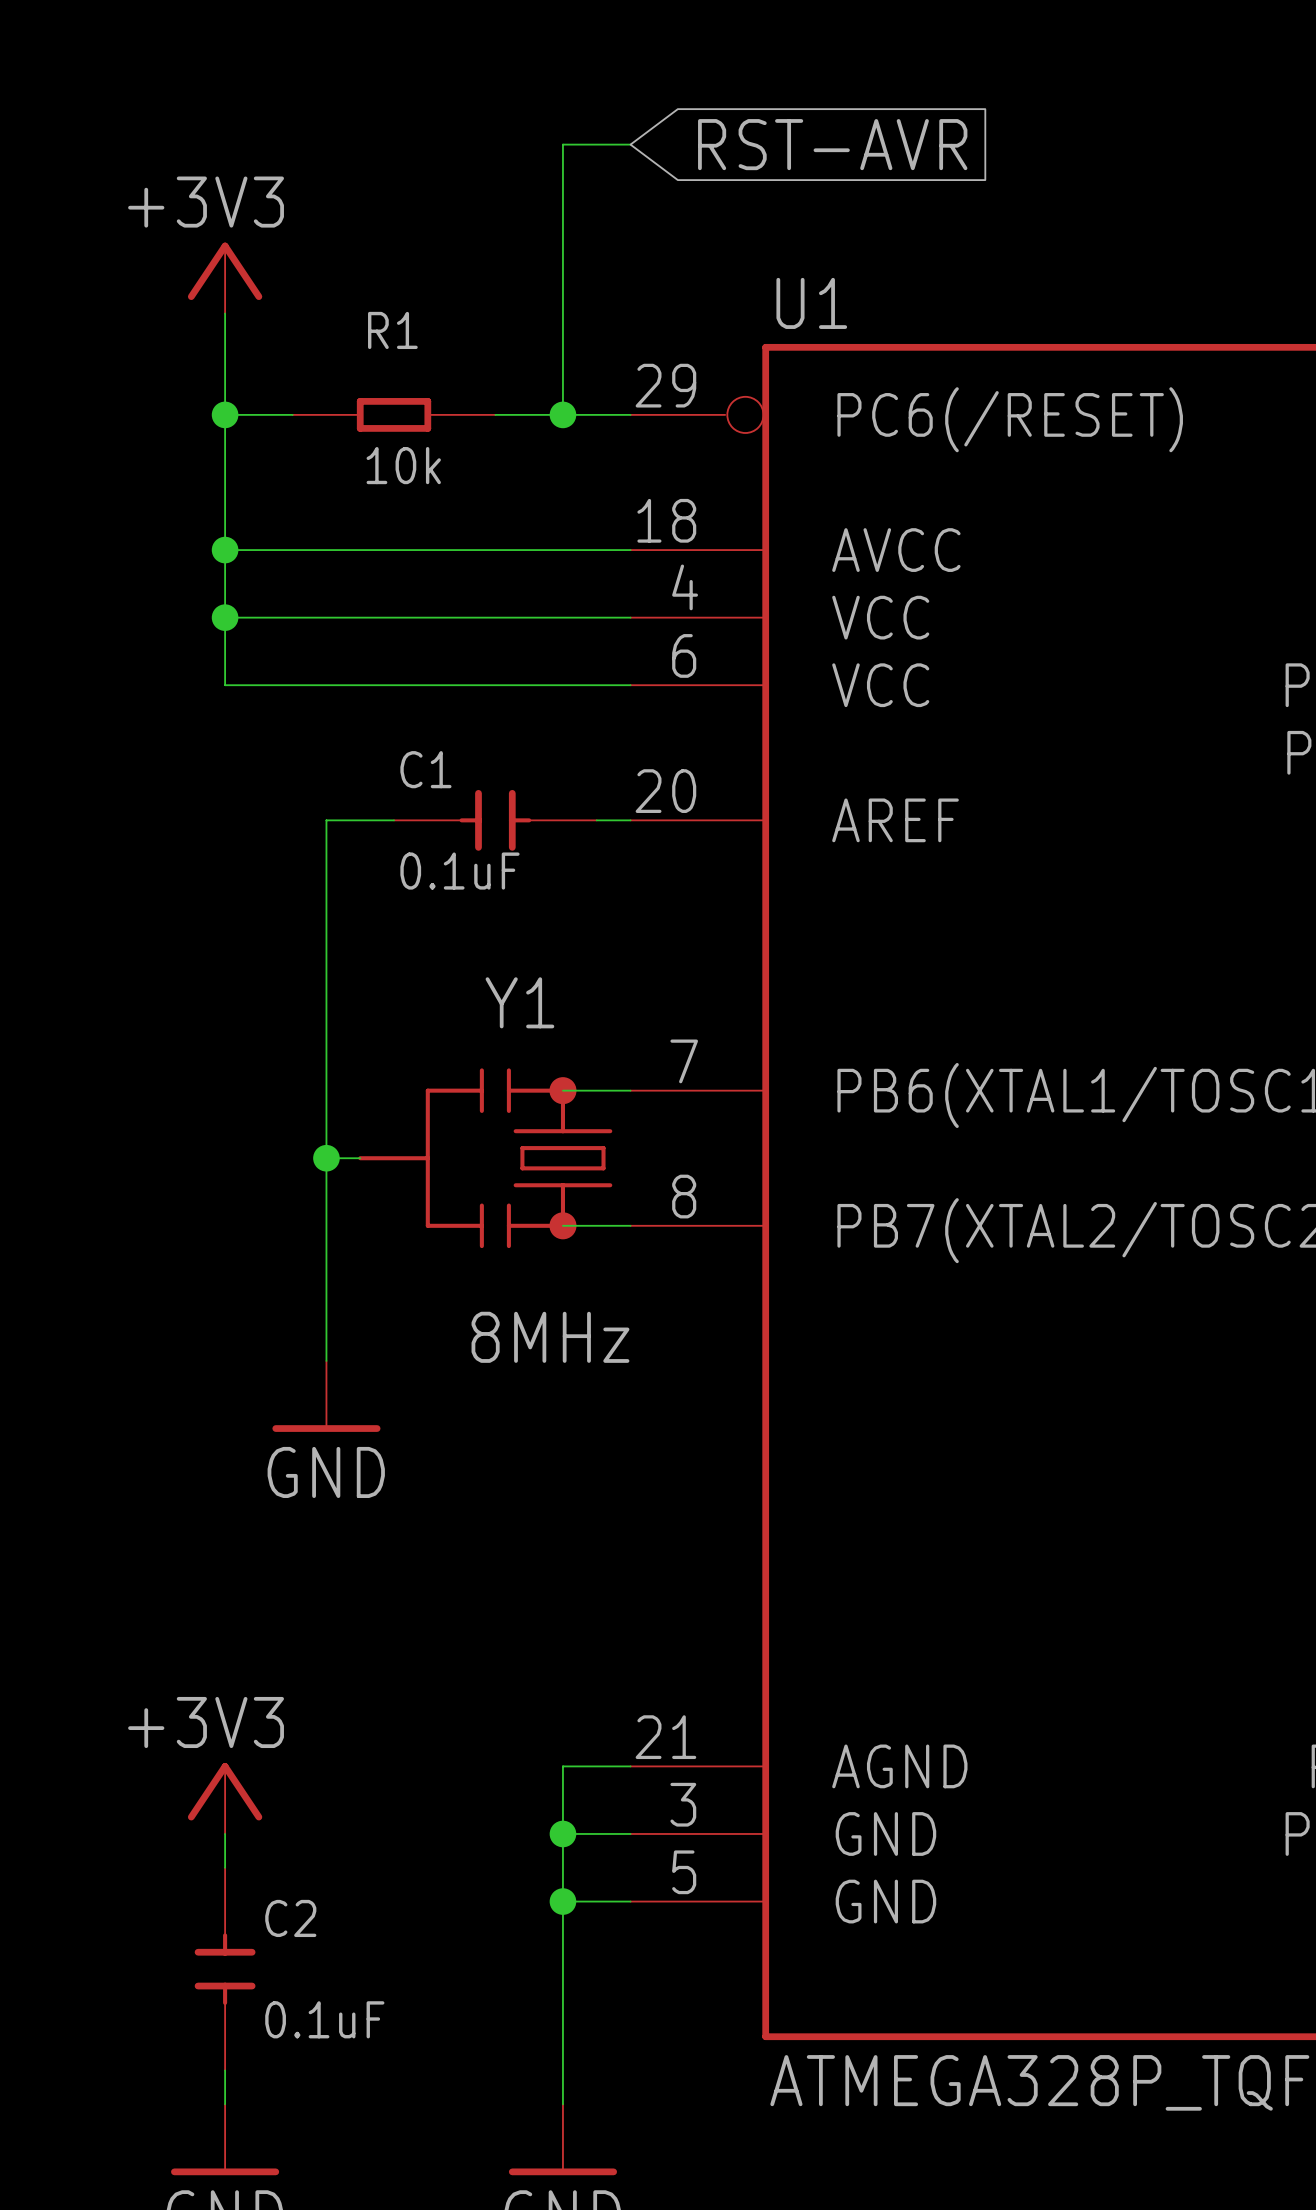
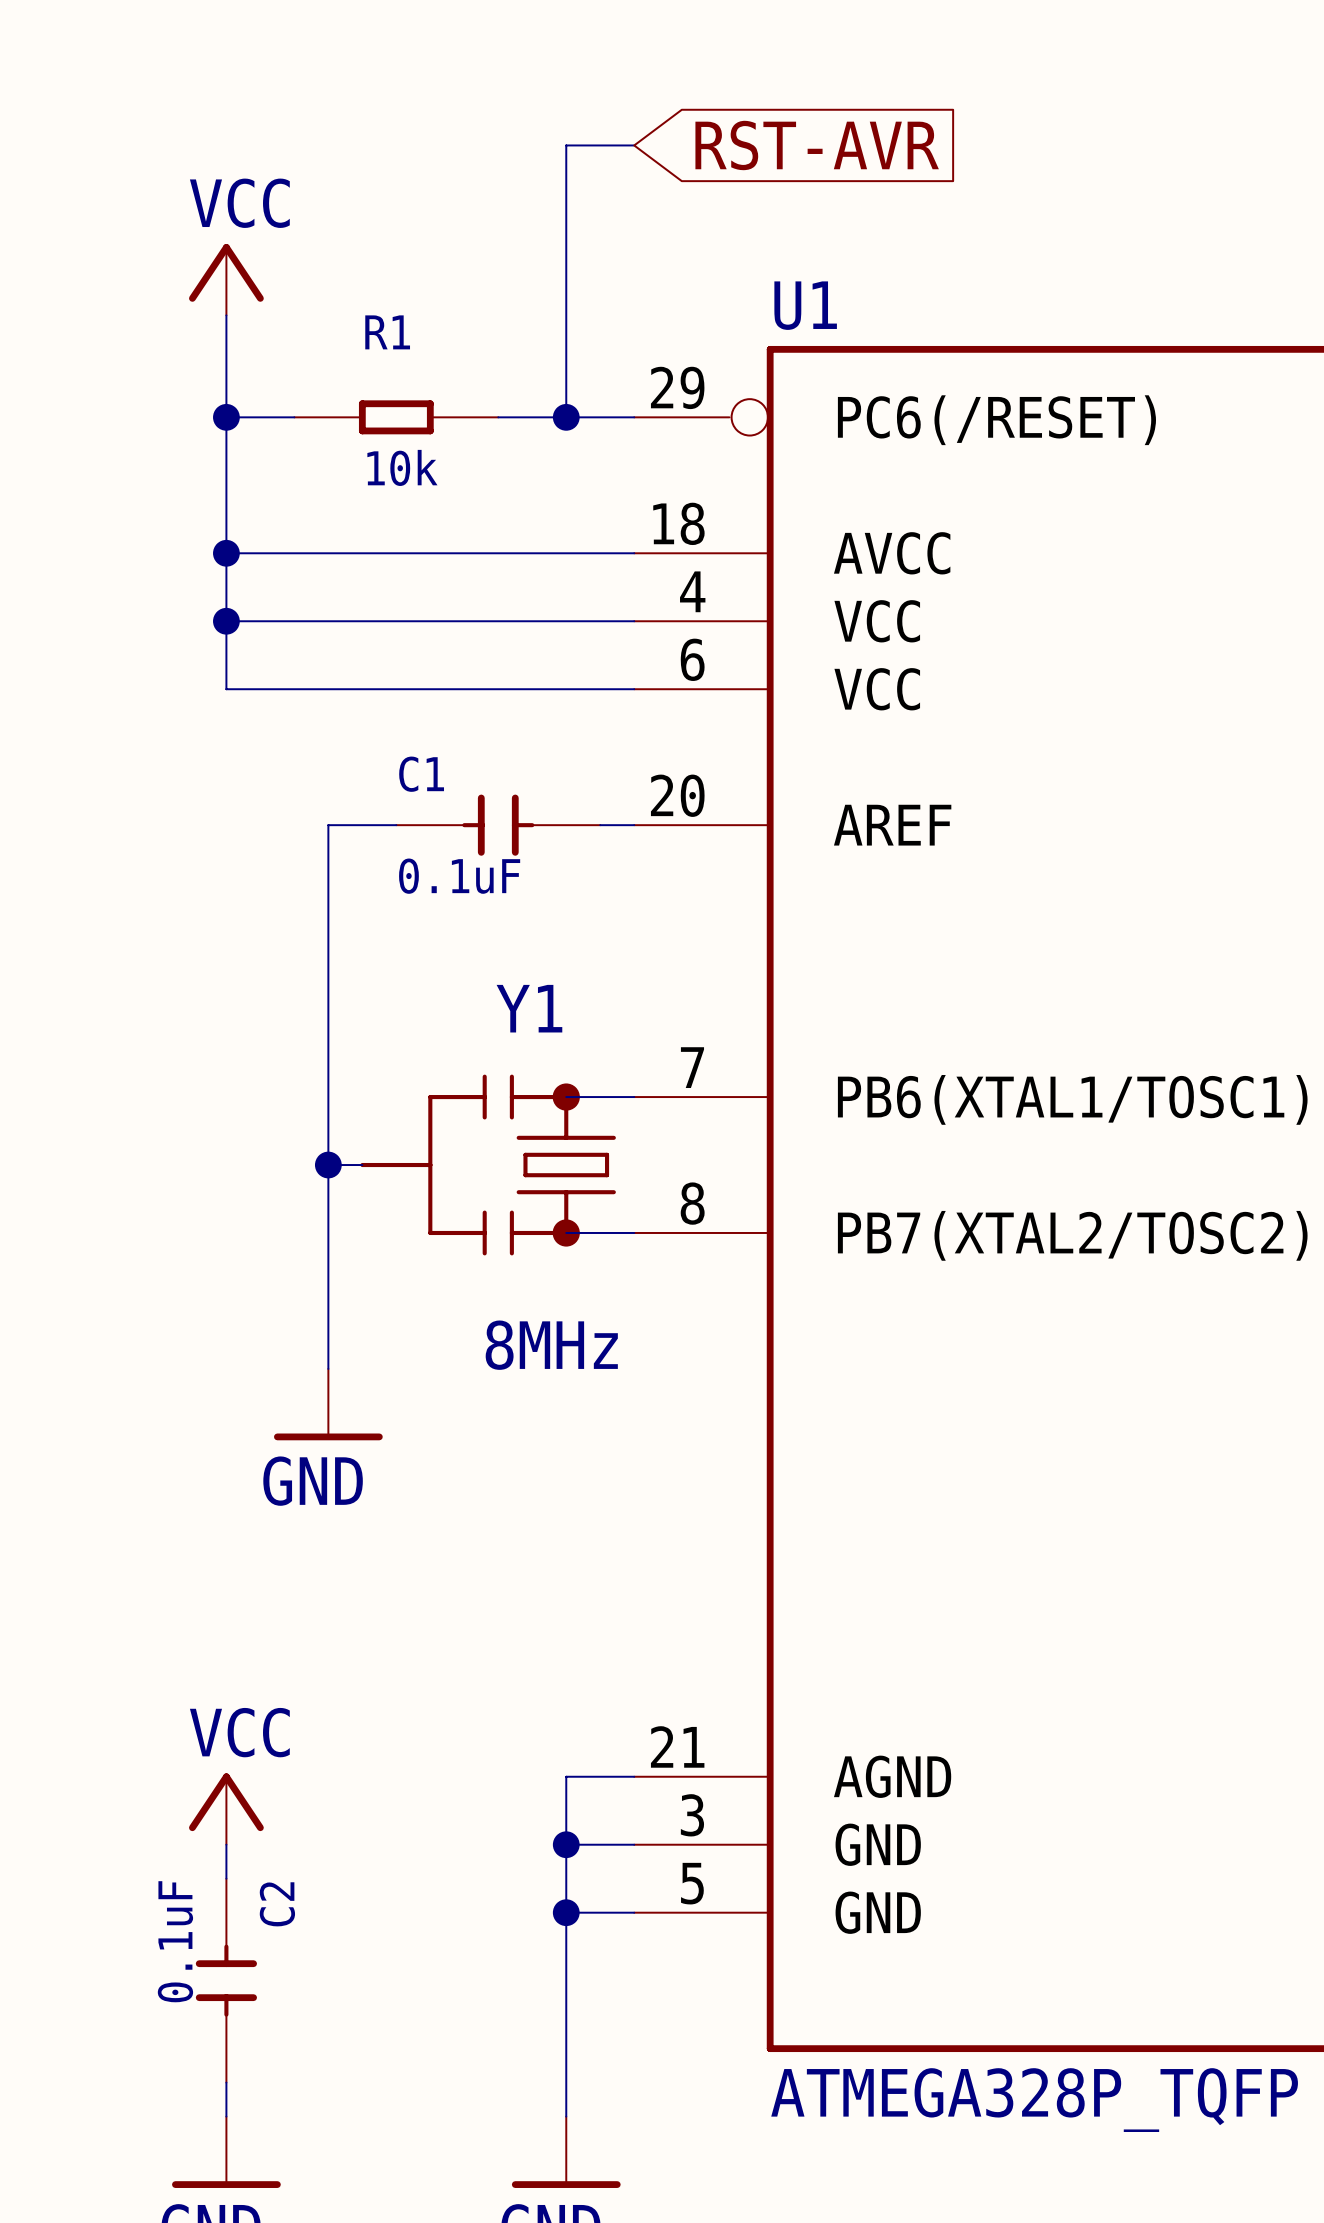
power symbol: +3V3 (225, 278) -> VCC (226, 279)
power symbol: +3V3 (225, 1798) -> VCC (226, 1809)
C2 name rotation: 0° (290, 1918) -> 90° counterclockwise (277, 1904)
C2 value rotation: 0° (324, 2019) -> 90° counterclockwise (175, 1941)
C2 value position: 0.1uF (324, 2019) -> 0.1uF (175, 1941)

